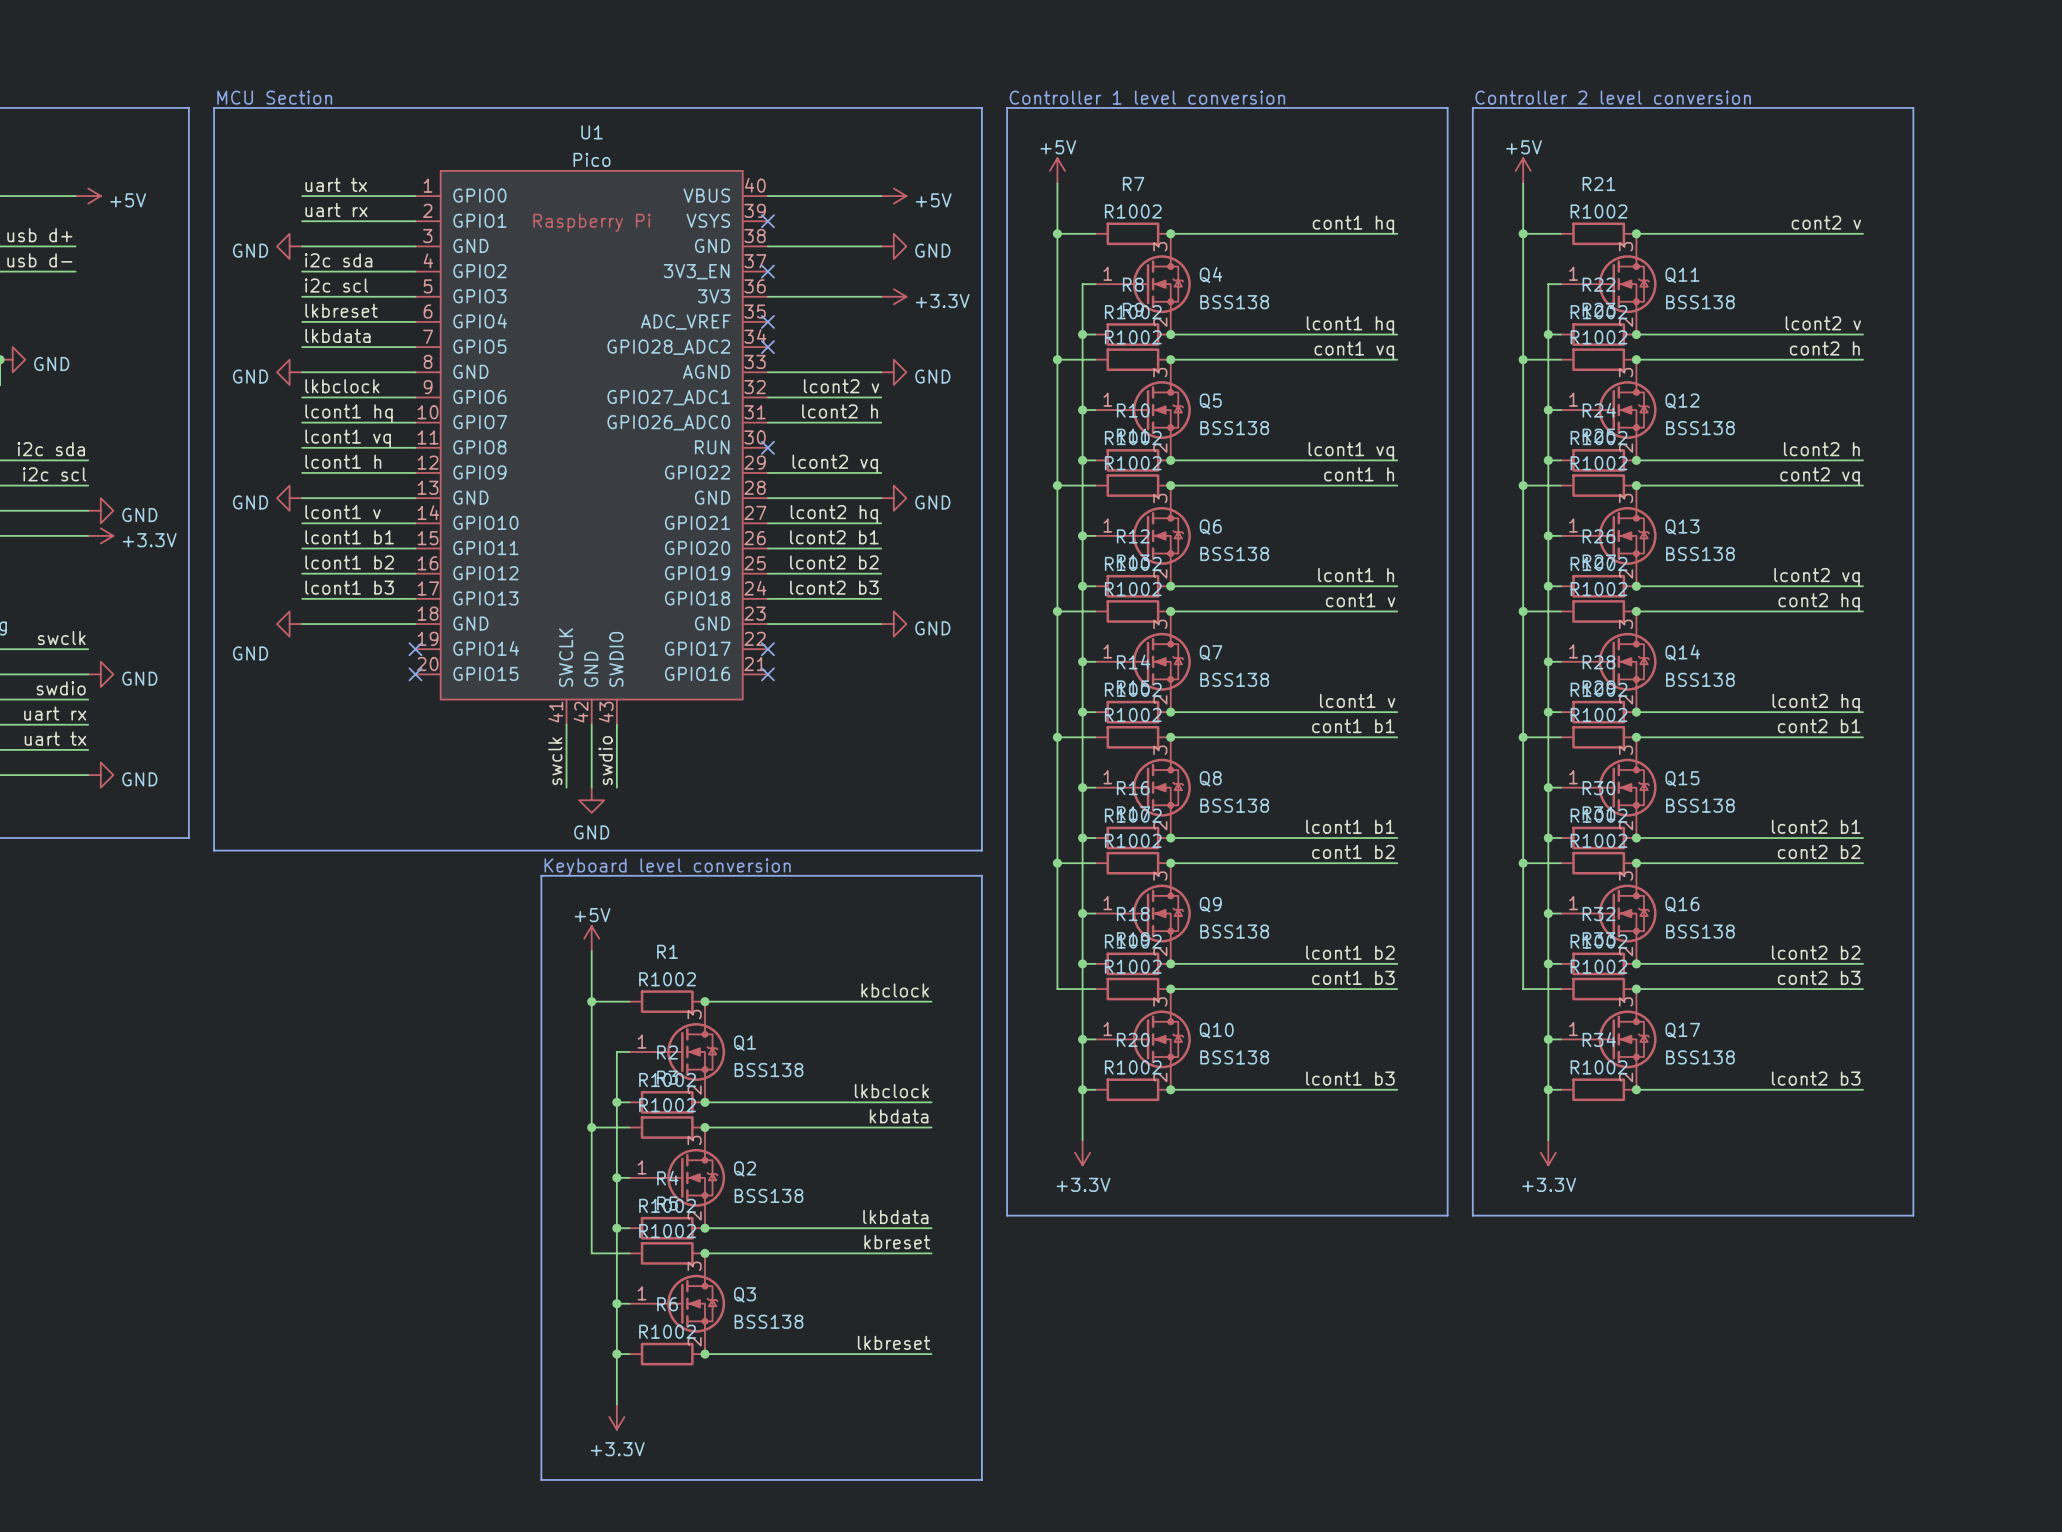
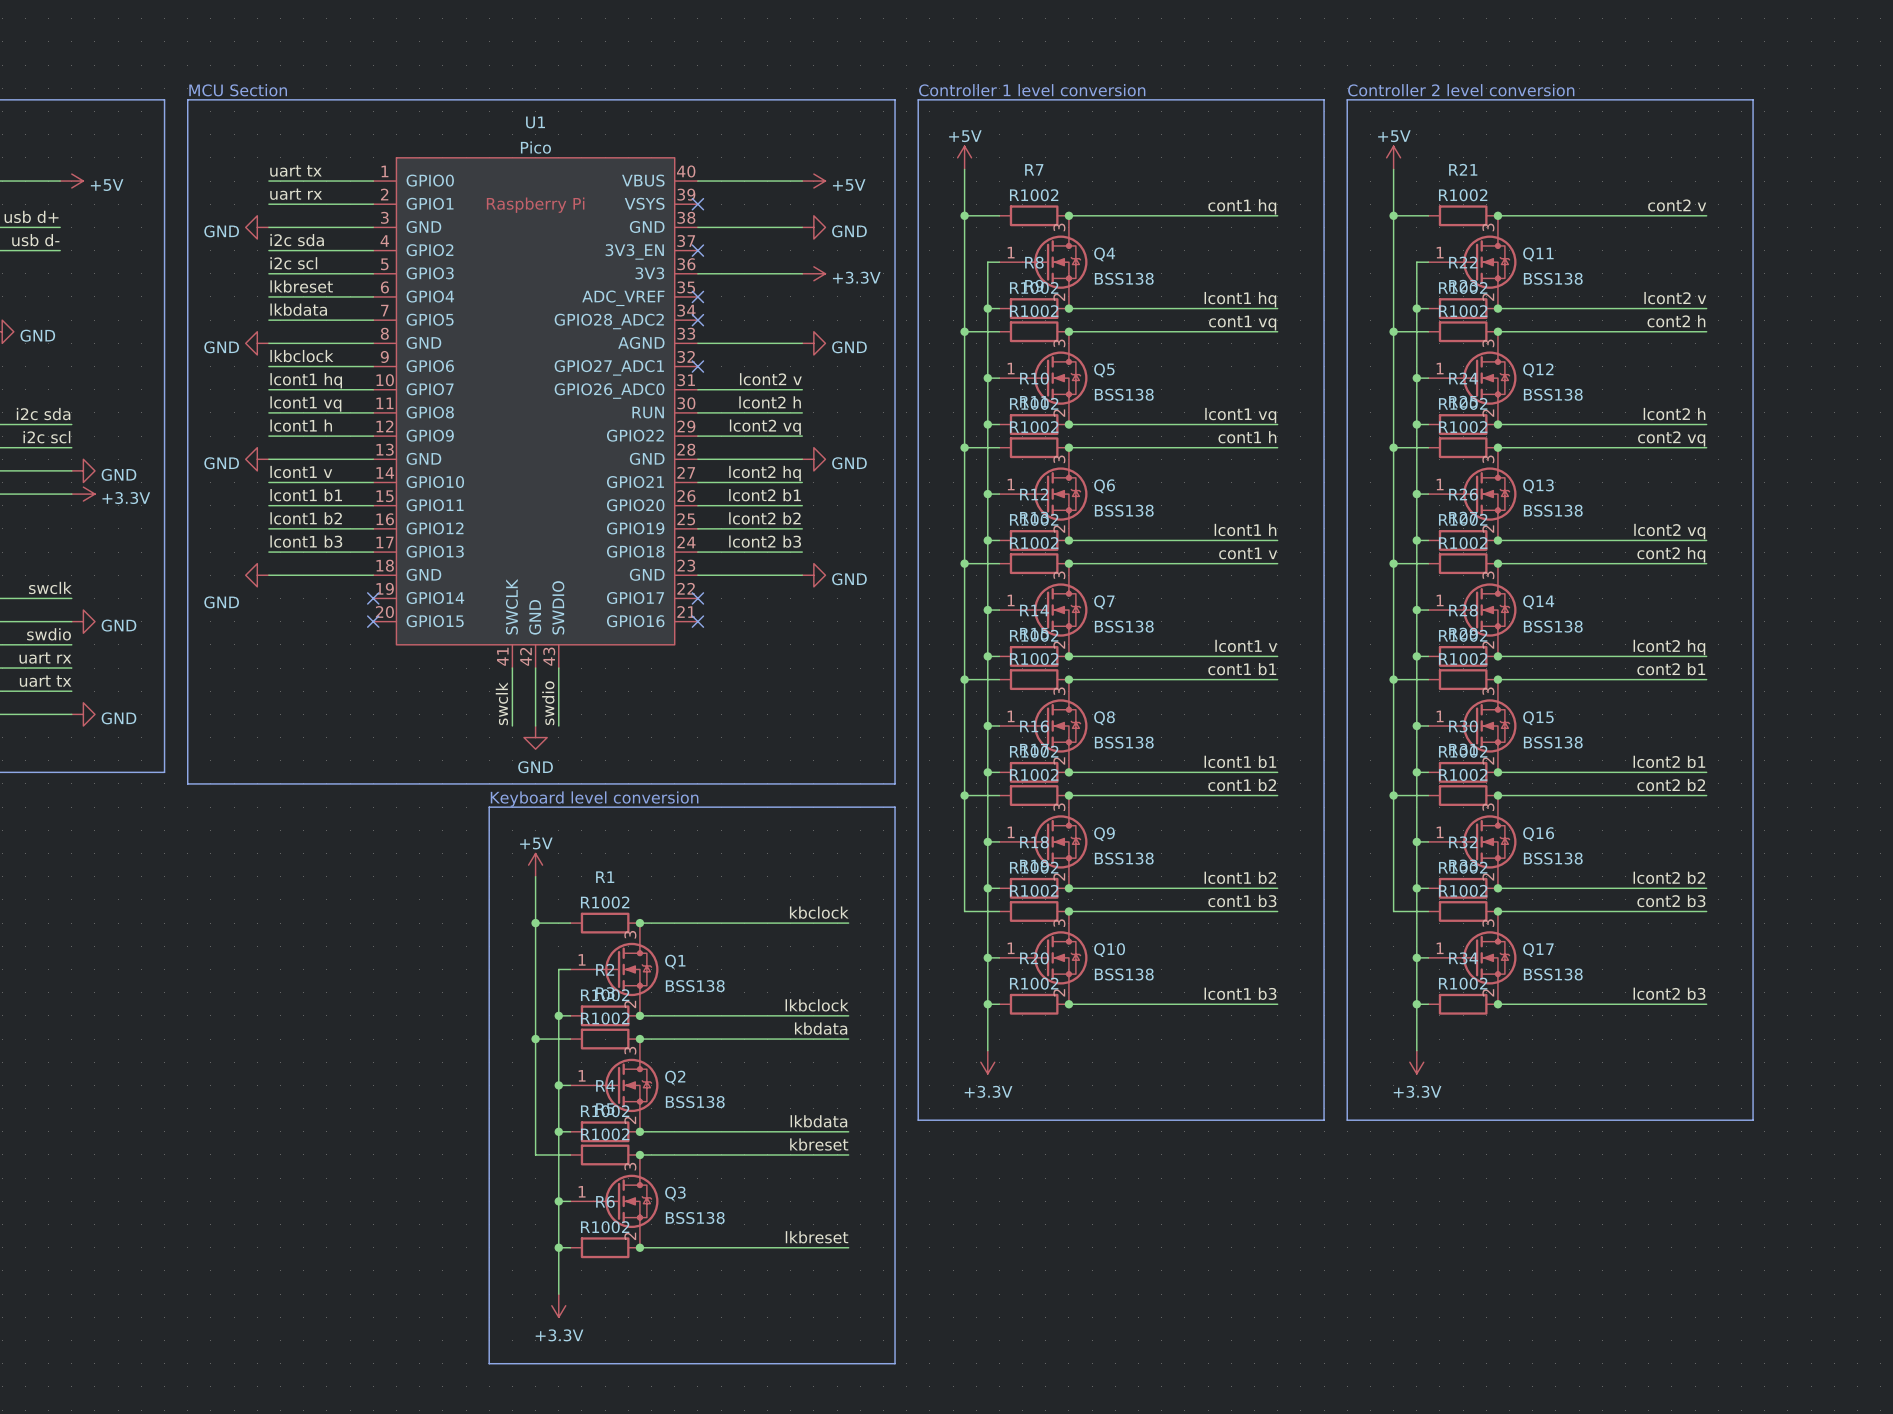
label: lcont2 v (841, 386) -> none
wire: (767, 397) (881, 397) -> (697, 412) (802, 412)
label: lcont2 h (840, 411) -> lcont2 v (770, 379)
label: none -> lcont2 h (770, 402)
no-connect mark position: (767, 447) -> (697, 366)

